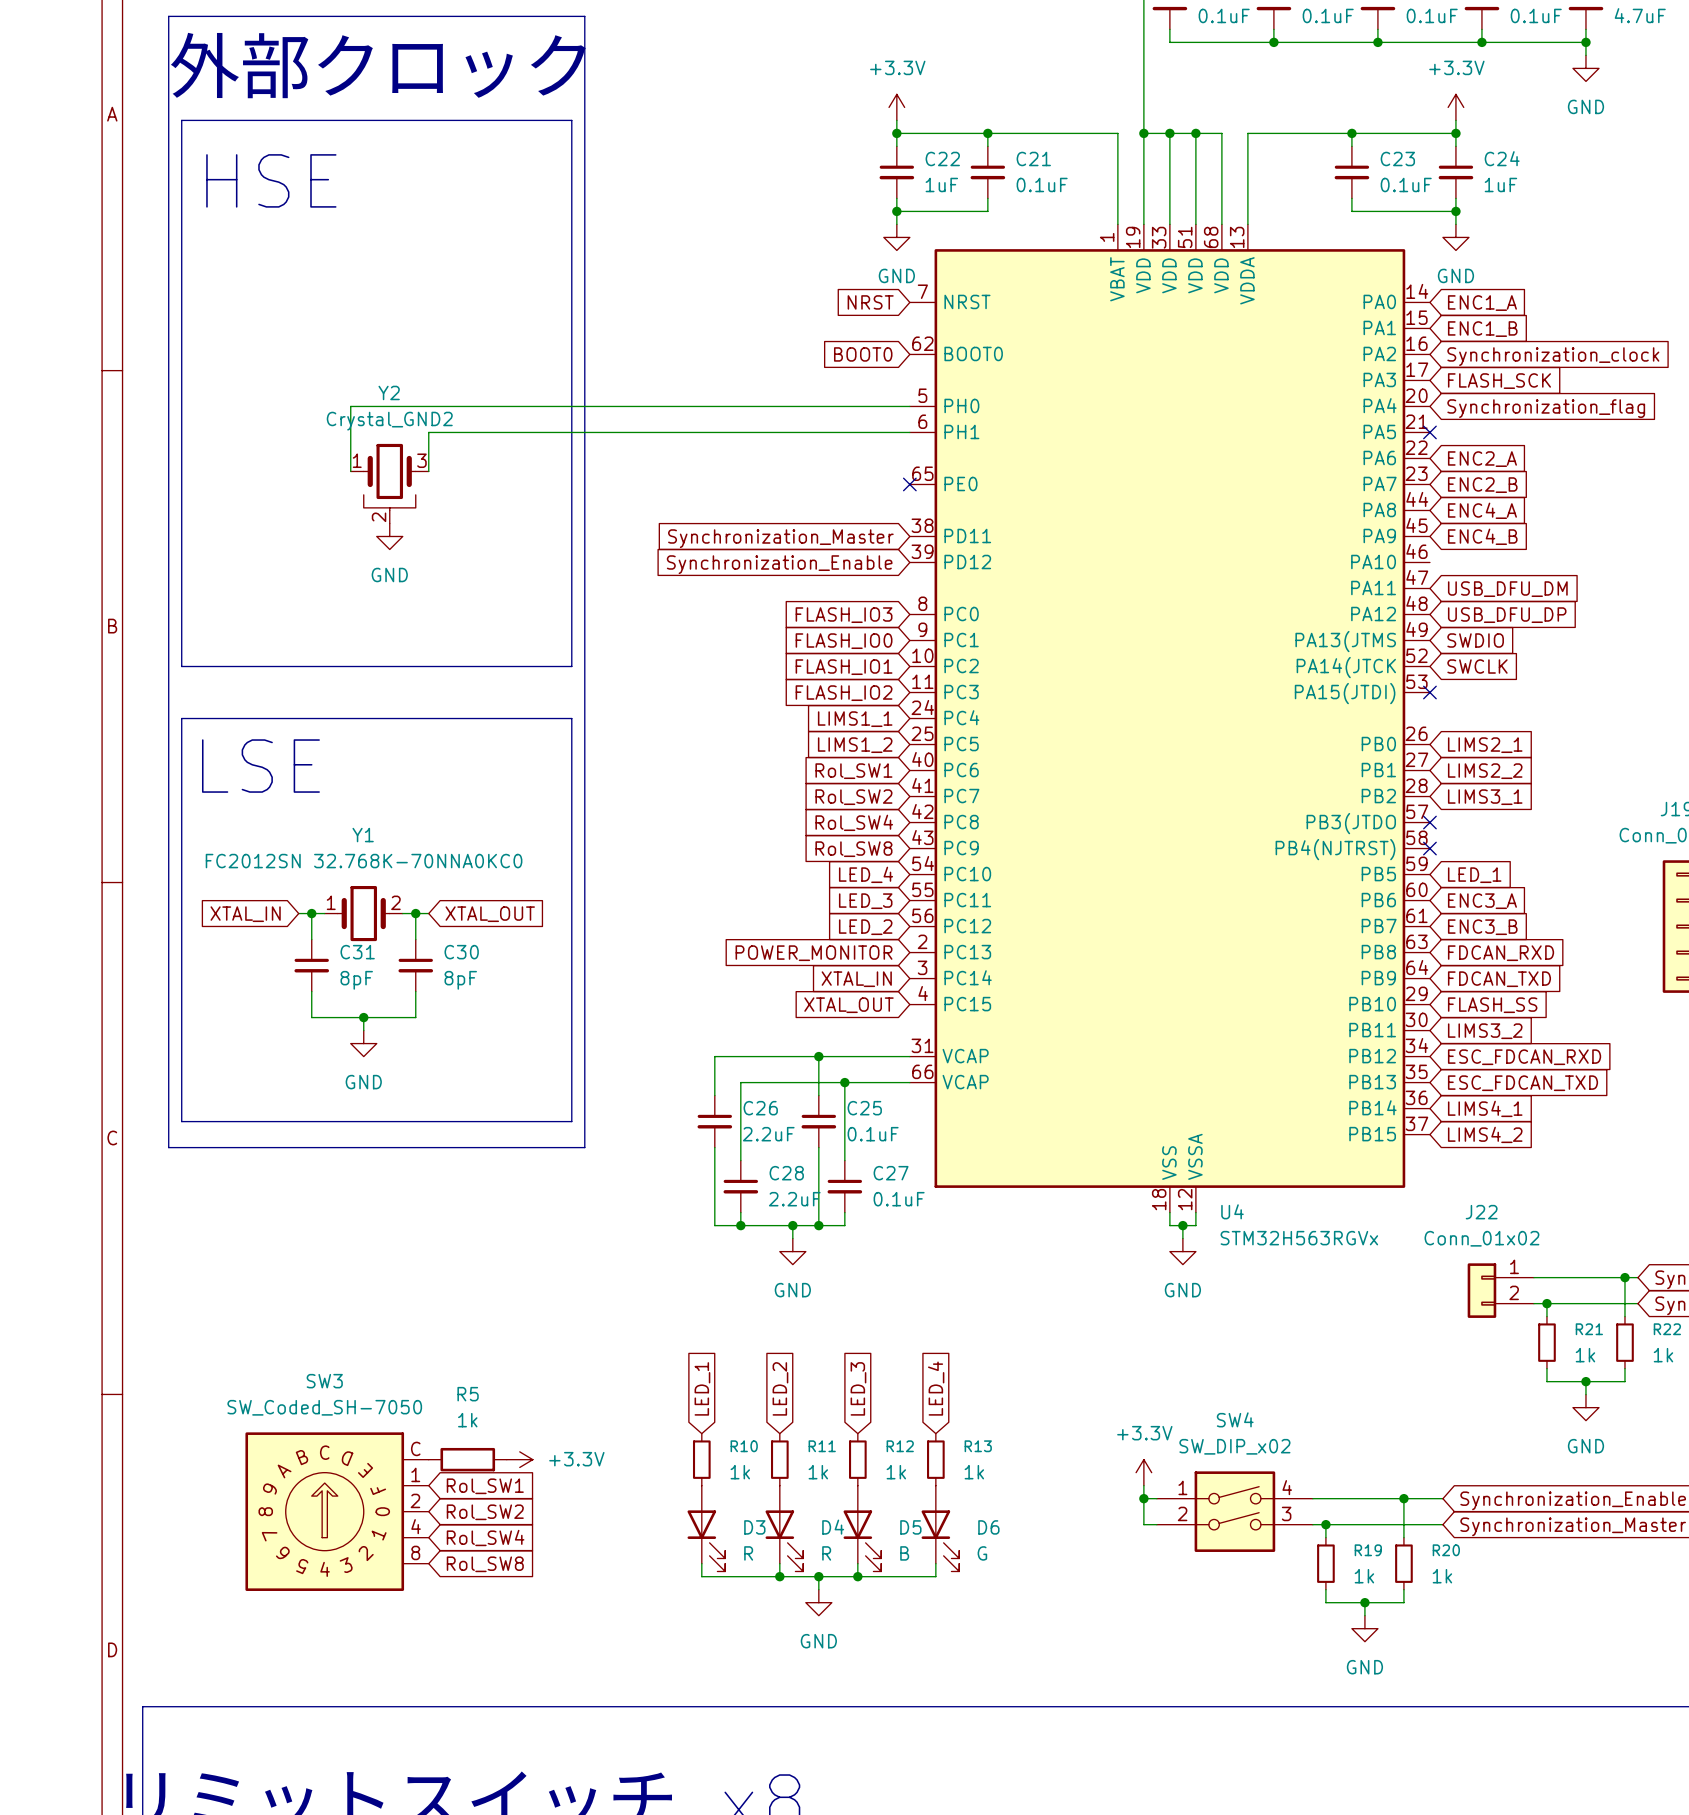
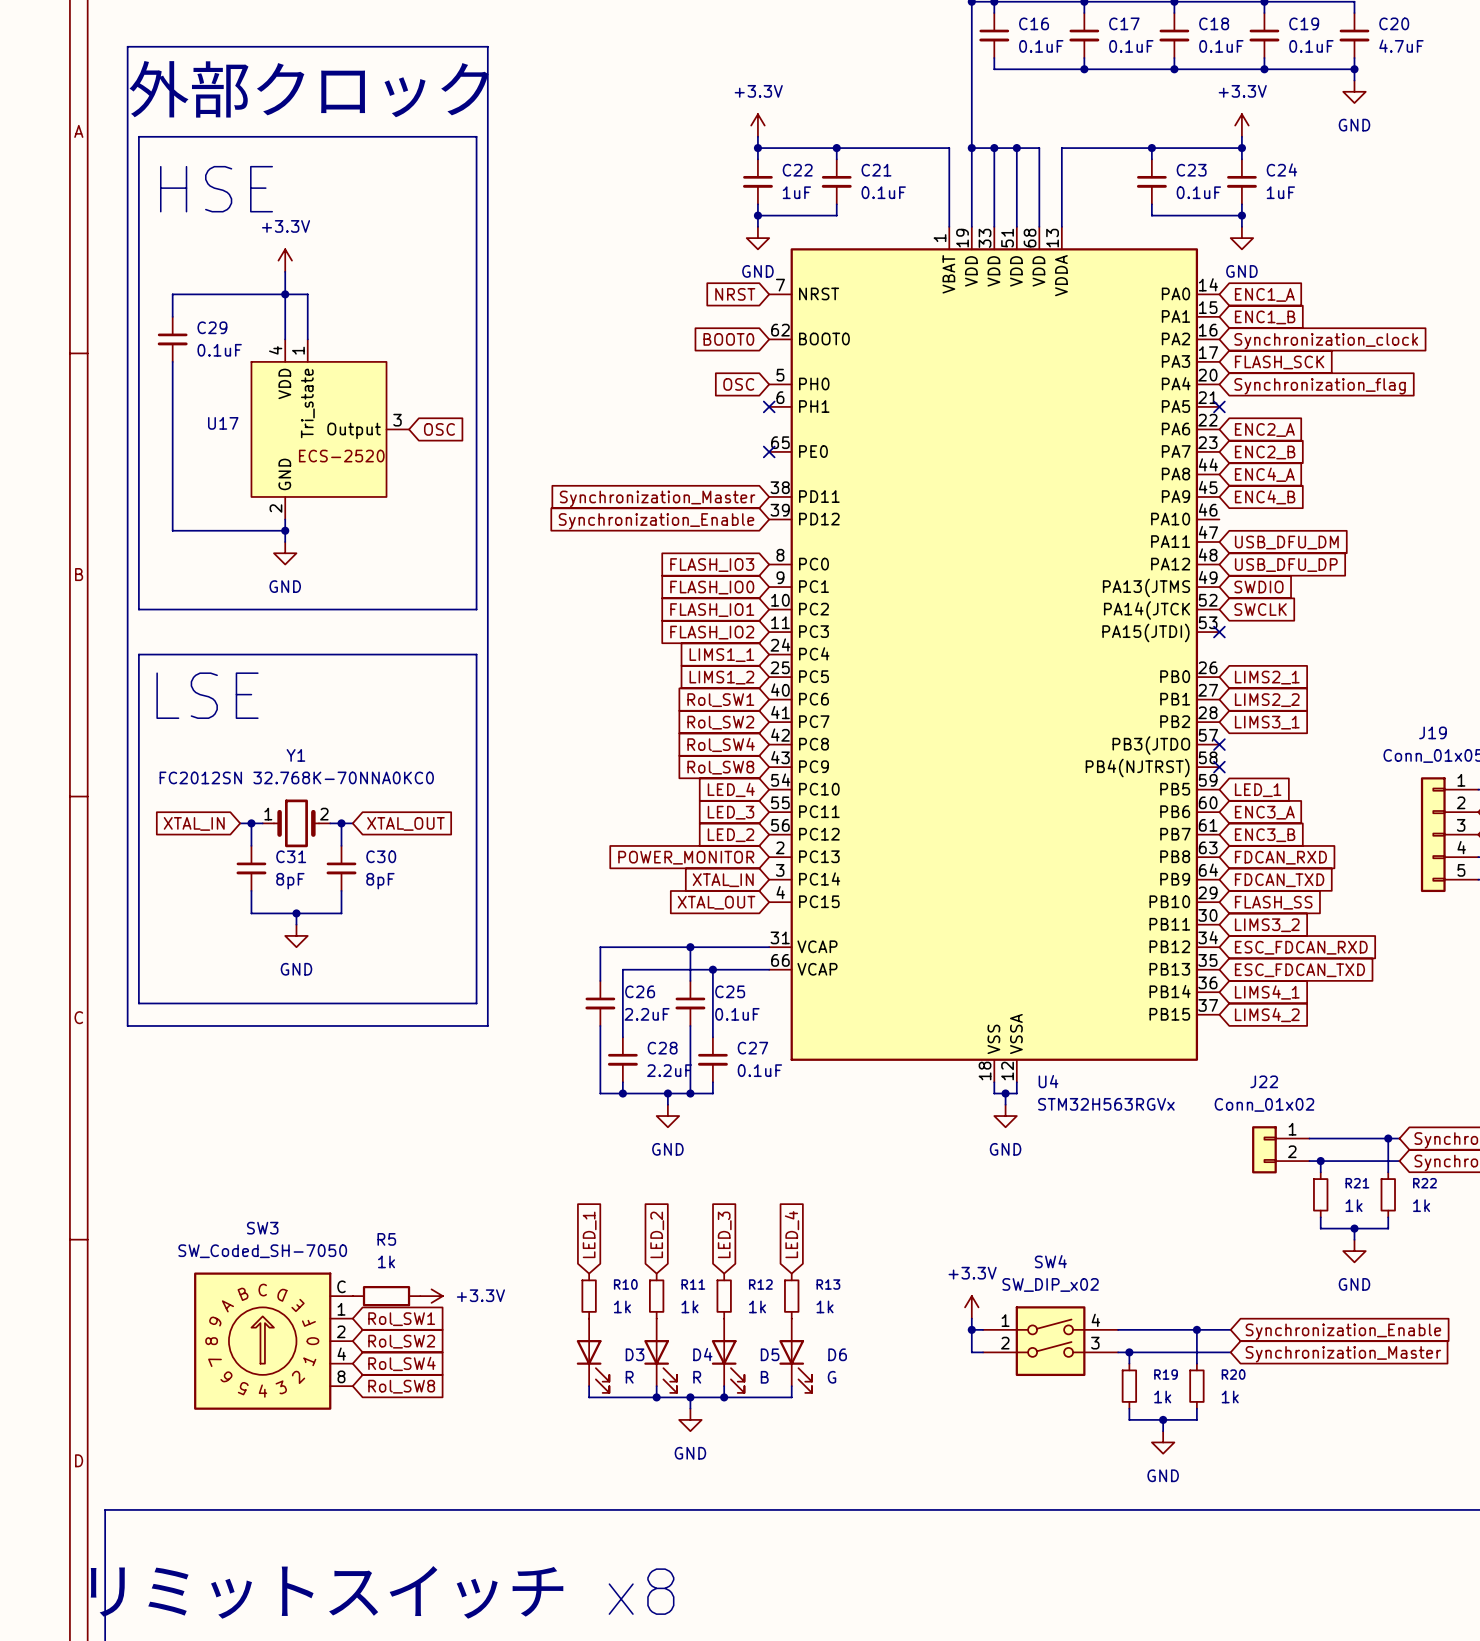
power symbol: none -> +3.3V (285, 260)
wire: none -> (285, 271) (285, 339)
junction: none -> (285, 294)
wire: none -> (172, 316) (172, 294) (307, 294) (307, 339)
C29: none -> 0.1uF (172, 339)
wire: none -> (172, 361) (172, 530) (285, 530)
global label: none -> OSC (738, 384)
wire: (909, 406) (350, 406) (350, 471) -> none
wire: (909, 432) (428, 432) (428, 471) -> none
no-connect mark: none -> (769, 406)
U17: none -> (330, 429)
global label: none -> OSC (439, 429)
Y2: Crystal_GND2 (389, 483) -> none
power symbol position: GND (389, 536) -> GND (285, 553)
wire: none -> (285, 519) (285, 542)
junction: none -> (285, 530)

